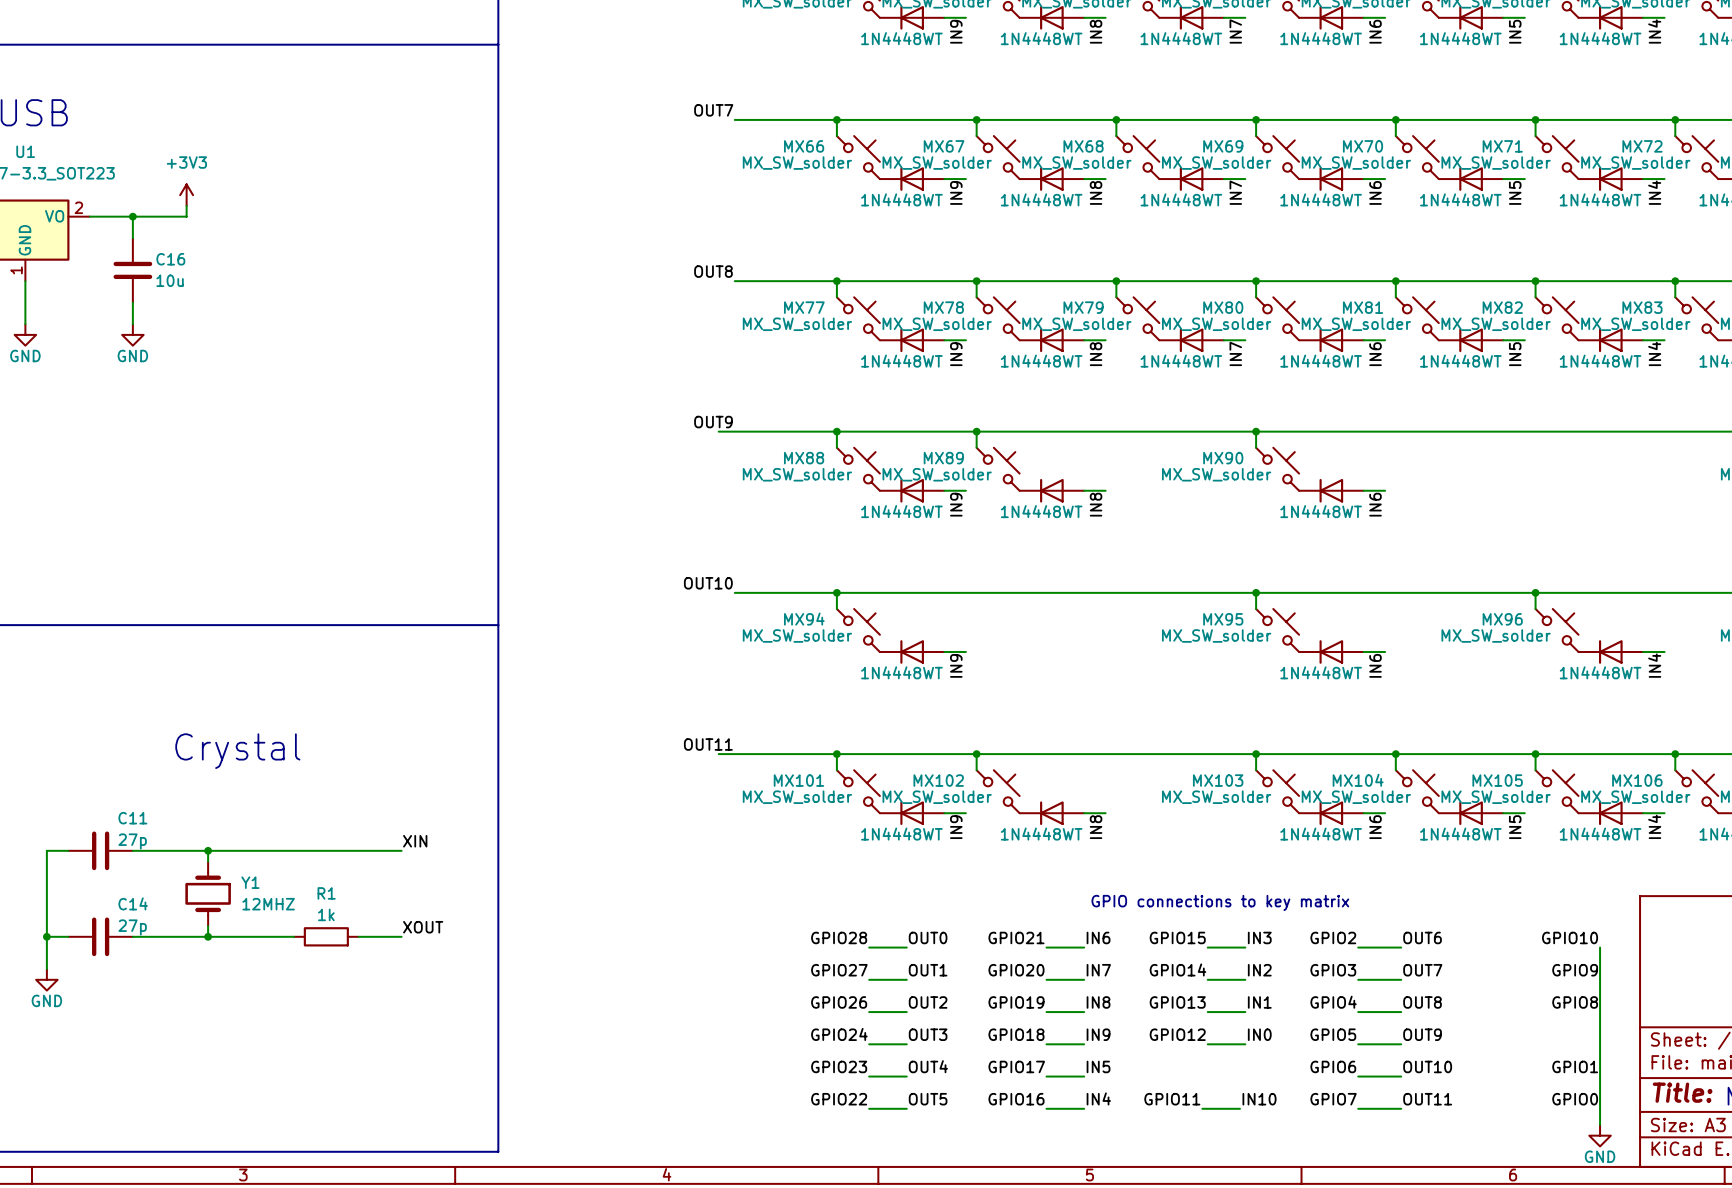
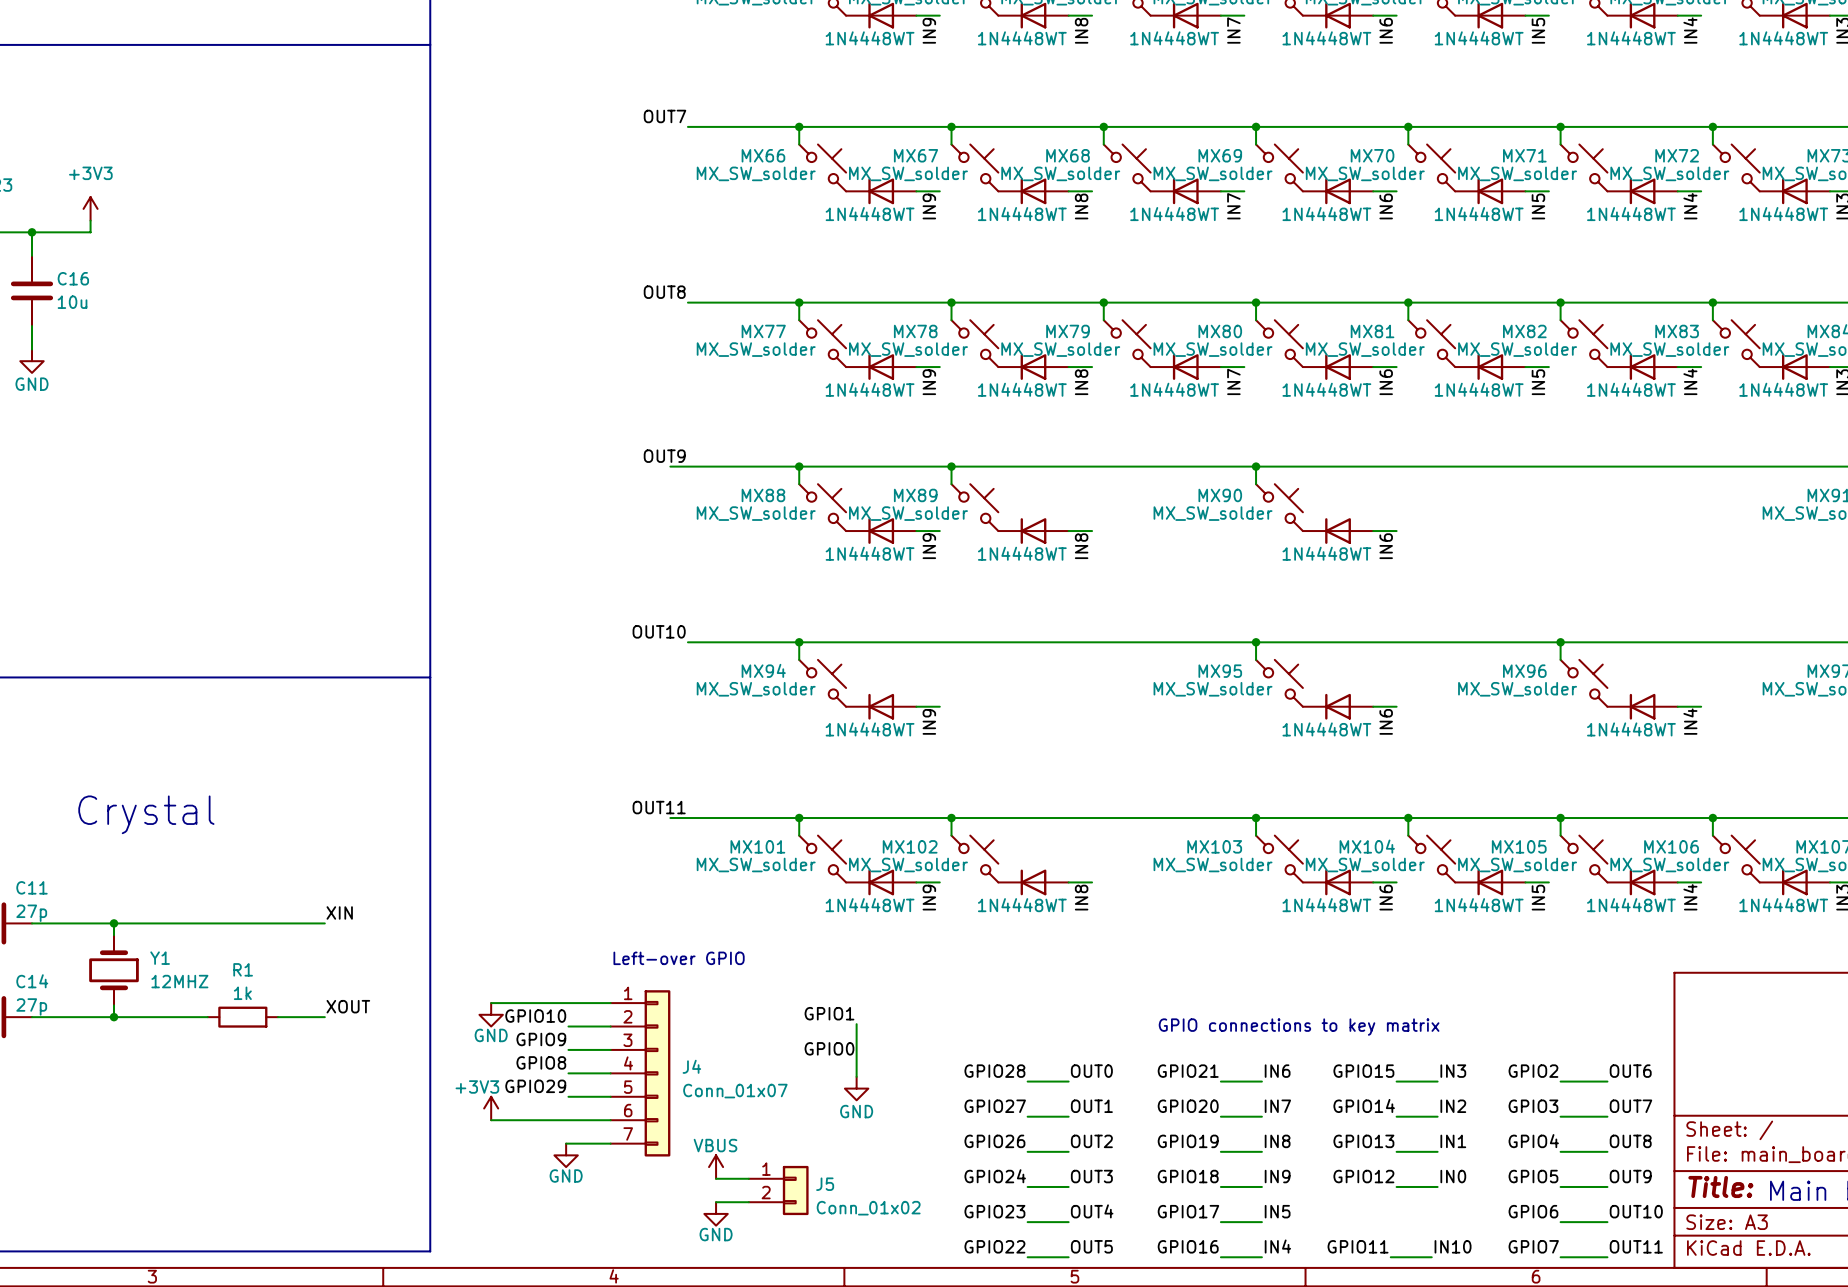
text: none -> Left-over GPIO (679, 958)
text position: GPIO connections to key matrix (1220, 902) -> GPIO connections to key matrix (1299, 1027)
wire: none -> (491, 1003) (610, 1003)
label: none -> GPIO1 (829, 1013)
power symbol: none -> GND (491, 1014)
label: none -> GPIO10 (535, 1016)
label position: GPIO28 (839, 937) -> GPIO28 (994, 1071)
label position: OUT0 (928, 937) -> OUT0 (1091, 1071)
label position: GPIO21 (1016, 937) -> GPIO21 (1188, 1071)
label position: IN6 (1098, 937) -> IN6 (1277, 1071)
label position: GPIO15 (1177, 937) -> GPIO15 (1363, 1071)
label position: IN3 (1259, 937) -> IN3 (1453, 1071)
label position: GPIO2 (1333, 937) -> GPIO2 (1533, 1071)
label position: OUT6 (1422, 937) -> OUT6 (1630, 1071)
label: GPIO10 (1570, 937) -> none
wire: none -> (856, 1024) (856, 1076)
wire: none -> (568, 1026) (610, 1026)
wire: (869, 947) (906, 947) -> (1027, 1081) (1068, 1081)
wire: (1046, 947) (1084, 947) -> (1220, 1081) (1261, 1081)
wire: (1207, 947) (1245, 947) -> (1396, 1081) (1437, 1081)
wire: (1358, 947) (1401, 947) -> (1560, 1081) (1607, 1081)
wire: (1600, 947) (1600, 1124) -> none
label: none -> GPIO9 (541, 1039)
label: none -> GPIO0 (829, 1048)
wire: none -> (568, 1049) (610, 1049)
label position: GPIO14 (1177, 969) -> GPIO14 (1364, 1105)
label position: GPIO27 (839, 970) -> GPIO27 (995, 1106)
label position: OUT1 (928, 970) -> OUT1 (1091, 1106)
label position: GPIO20 (1016, 970) -> GPIO20 (1188, 1106)
label position: IN7 (1098, 970) -> IN7 (1277, 1106)
label position: IN2 (1259, 970) -> IN2 (1453, 1106)
label position: GPIO3 (1333, 970) -> GPIO3 (1533, 1106)
label position: OUT7 (1422, 970) -> OUT7 (1630, 1106)
label: GPIO9 (1575, 970) -> none
label: none -> GPIO8 (541, 1062)
wire: (869, 979) (906, 979) -> (1027, 1116) (1068, 1116)
wire: (1046, 979) (1084, 979) -> (1220, 1116) (1261, 1116)
wire: (1207, 979) (1245, 979) -> (1396, 1116) (1437, 1116)
wire: (1358, 979) (1401, 979) -> (1560, 1116) (1607, 1116)
wire: none -> (568, 1073) (610, 1073)
J4: none -> Conn_01x07 (640, 1073)
label: none -> GPIO29 (535, 1086)
label position: GPIO26 (839, 1002) -> GPIO26 (994, 1141)
power symbol: none -> GND (856, 1088)
label position: OUT2 (928, 1002) -> OUT2 (1091, 1141)
label position: GPIO19 (1016, 1002) -> GPIO19 (1188, 1141)
label position: IN8 (1098, 1002) -> IN8 (1277, 1141)
label position: GPIO13 (1177, 1002) -> GPIO13 (1363, 1141)
label position: IN1 (1259, 1002) -> IN1 (1453, 1141)
label position: GPIO4 (1333, 1002) -> GPIO4 (1533, 1141)
label position: OUT8 (1422, 1002) -> OUT8 (1630, 1141)
label: GPIO8 (1575, 1002) -> none
wire: none -> (568, 1096) (610, 1096)
wire: (869, 1012) (906, 1012) -> (1027, 1151) (1068, 1151)
wire: (1046, 1012) (1084, 1012) -> (1220, 1151) (1261, 1151)
wire: (1207, 1012) (1245, 1012) -> (1396, 1151) (1437, 1151)
wire: (1358, 1012) (1401, 1012) -> (1560, 1151) (1607, 1151)
power symbol: none -> +3V3 (491, 1108)
wire: none -> (491, 1120) (610, 1120)
label position: GPIO24 (839, 1034) -> GPIO24 (995, 1176)
label position: OUT3 (928, 1034) -> OUT3 (1091, 1176)
label position: GPIO18 (1016, 1034) -> GPIO18 (1188, 1176)
label position: IN9 (1098, 1034) -> IN9 (1277, 1176)
label position: GPIO12 (1177, 1034) -> GPIO12 (1363, 1176)
label position: IN0 (1259, 1034) -> IN0 (1453, 1176)
label position: GPIO5 (1333, 1034) -> GPIO5 (1533, 1176)
label position: OUT9 (1422, 1034) -> OUT9 (1630, 1176)
wire: (869, 1044) (906, 1044) -> (1027, 1186) (1068, 1186)
wire: (1046, 1044) (1084, 1044) -> (1220, 1186) (1261, 1186)
wire: (1207, 1044) (1245, 1044) -> (1396, 1186) (1437, 1186)
wire: (1358, 1044) (1401, 1044) -> (1560, 1186) (1607, 1186)
wire: none -> (566, 1143) (610, 1143)
power symbol: none -> GND (566, 1155)
label position: GPIO23 (839, 1066) -> GPIO23 (994, 1211)
label position: OUT4 (928, 1066) -> OUT4 (1092, 1211)
label position: GPIO17 (1016, 1066) -> GPIO17 (1188, 1211)
label position: IN5 (1098, 1066) -> IN5 (1277, 1211)
label position: GPIO6 (1333, 1066) -> GPIO6 (1533, 1211)
label position: OUT10 (1427, 1066) -> OUT10 (1636, 1211)
label: GPIO1 (1575, 1066) -> none
power symbol: none -> VBUS (716, 1167)
wire: (869, 1076) (906, 1076) -> (1027, 1222) (1068, 1222)
wire: (1046, 1076) (1084, 1076) -> (1220, 1222) (1261, 1222)
wire: (1358, 1076) (1401, 1076) -> (1560, 1222) (1607, 1222)
wire: none -> (716, 1178) (748, 1178)
J5: none -> Conn_01x02 (778, 1190)
label position: IN4 (1098, 1098) -> IN4 (1277, 1246)
label position: GPIO22 (839, 1099) -> GPIO22 (994, 1246)
label position: OUT5 (928, 1099) -> OUT5 (1091, 1246)
label position: GPIO16 (1016, 1099) -> GPIO16 (1188, 1246)
label position: GPIO11 (1172, 1099) -> GPIO11 (1358, 1246)
label position: IN10 (1259, 1099) -> IN10 (1453, 1246)
label position: GPIO7 (1333, 1099) -> GPIO7 (1533, 1246)
label position: OUT11 (1427, 1099) -> OUT11 (1636, 1246)
label: GPIO0 (1575, 1099) -> none
wire: none -> (716, 1202) (748, 1202)
wire: (869, 1108) (906, 1108) -> (1027, 1257) (1068, 1257)
wire: (1046, 1108) (1084, 1108) -> (1220, 1257) (1261, 1257)
wire: (1202, 1108) (1239, 1108) -> (1390, 1257) (1431, 1257)
wire: (1358, 1108) (1401, 1108) -> (1560, 1257) (1607, 1257)
power symbol: none -> GND (716, 1213)
power symbol: GND (1600, 1135) -> none

